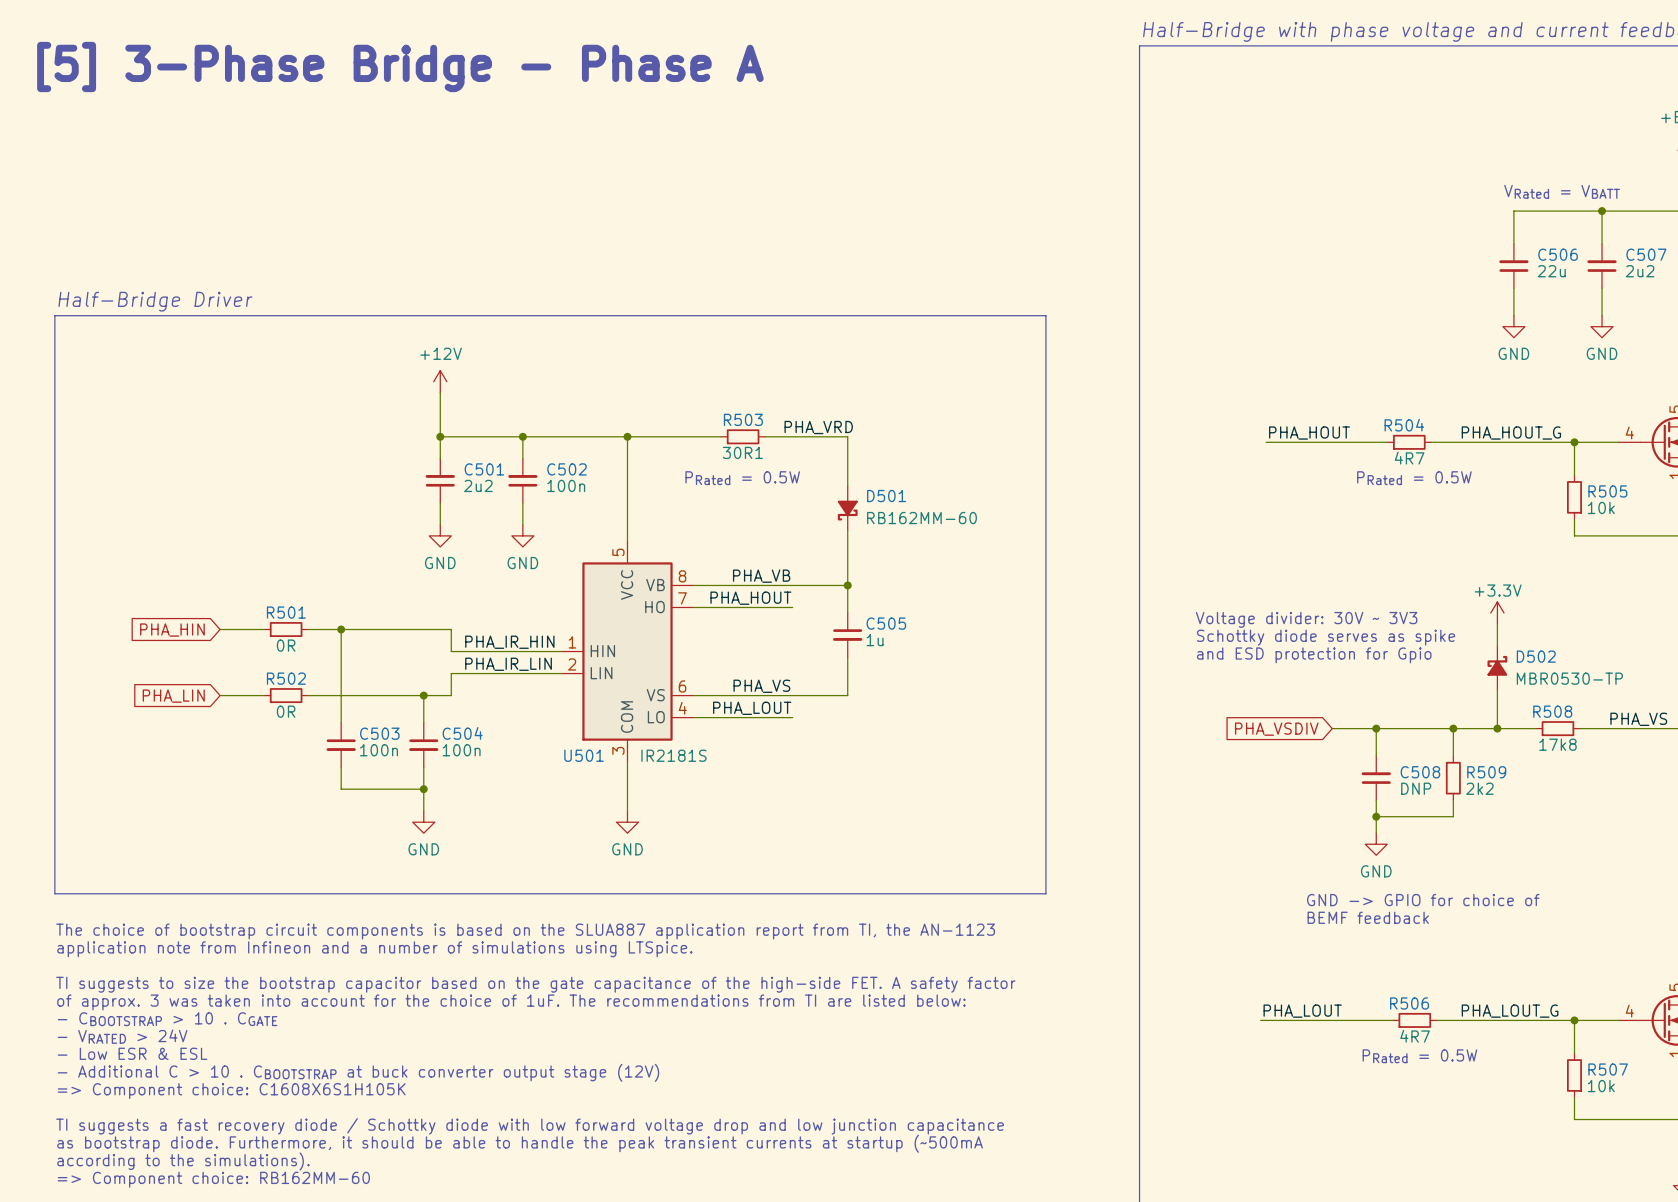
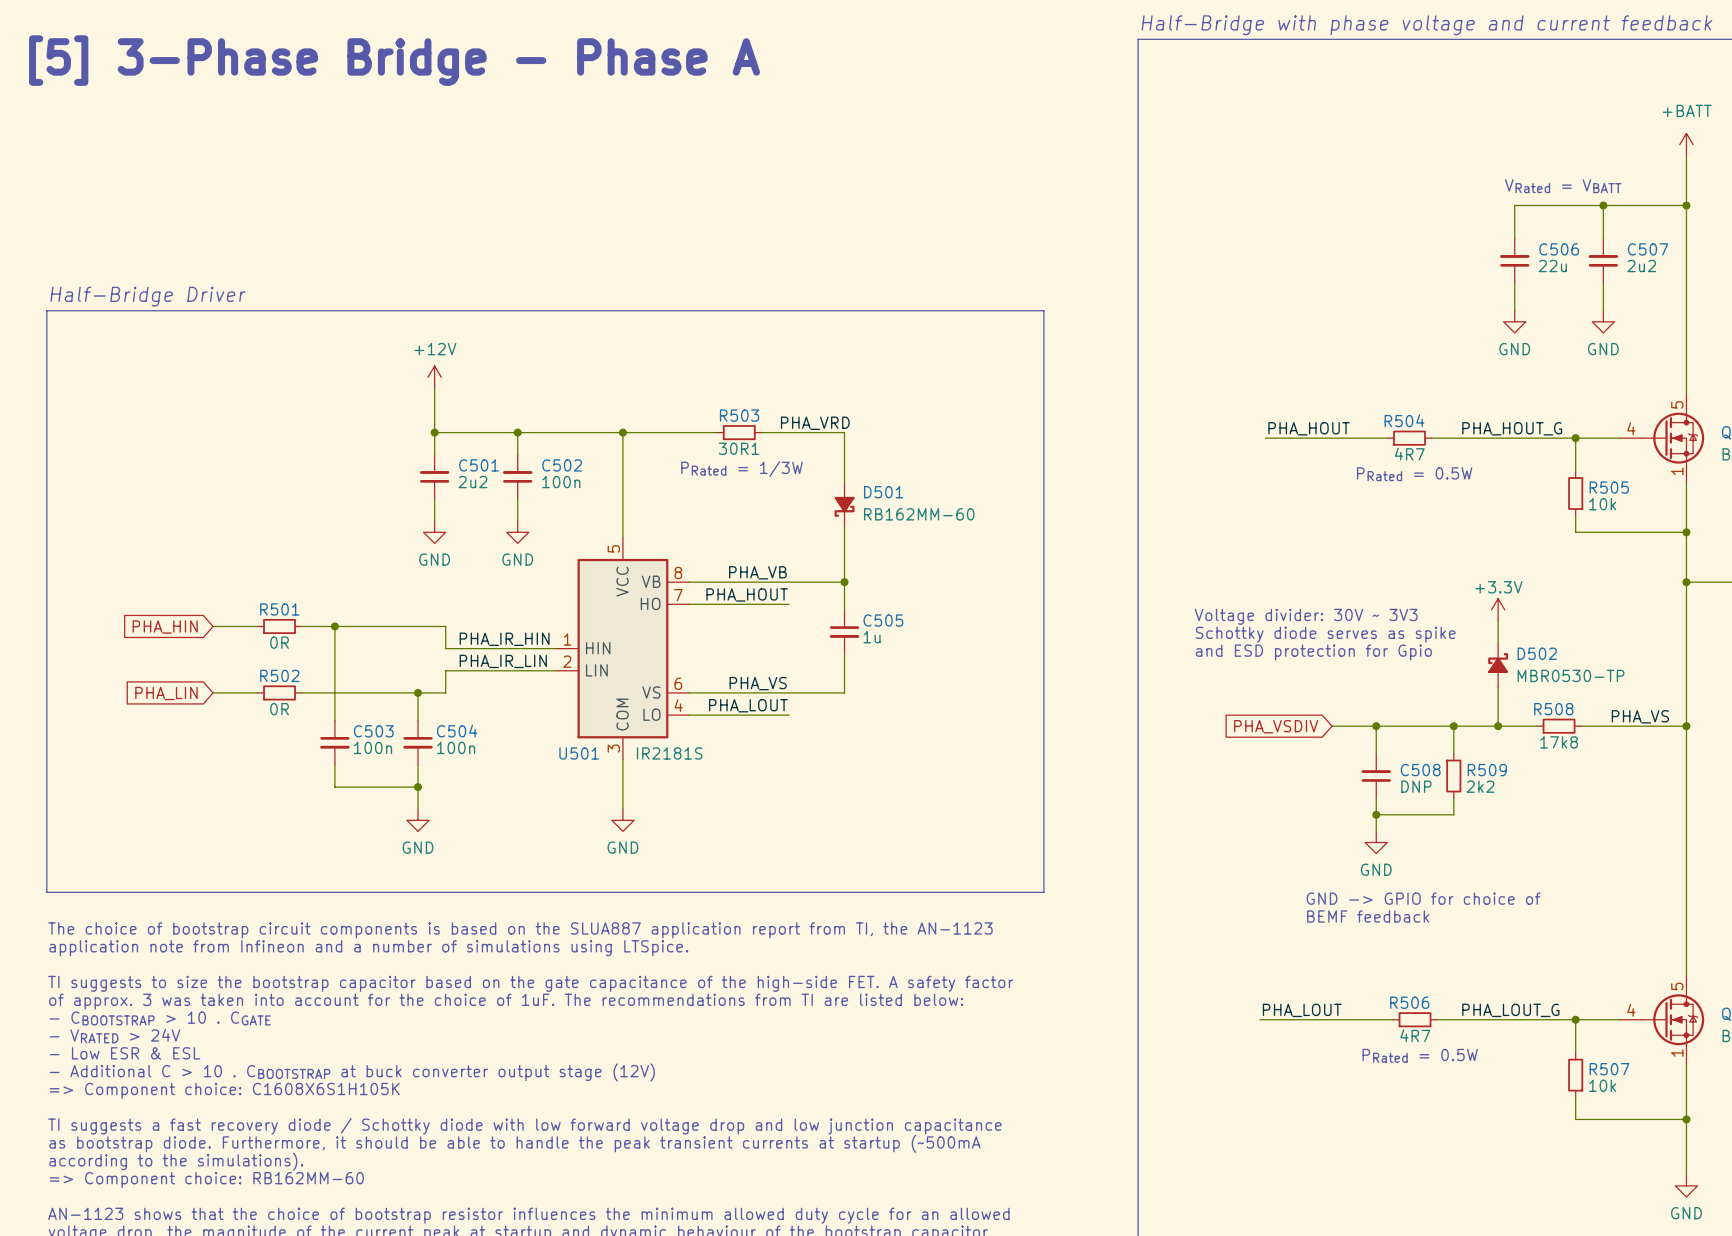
text: PRated = 0.5W (742, 478) -> PRated = 1/3W (742, 468)

